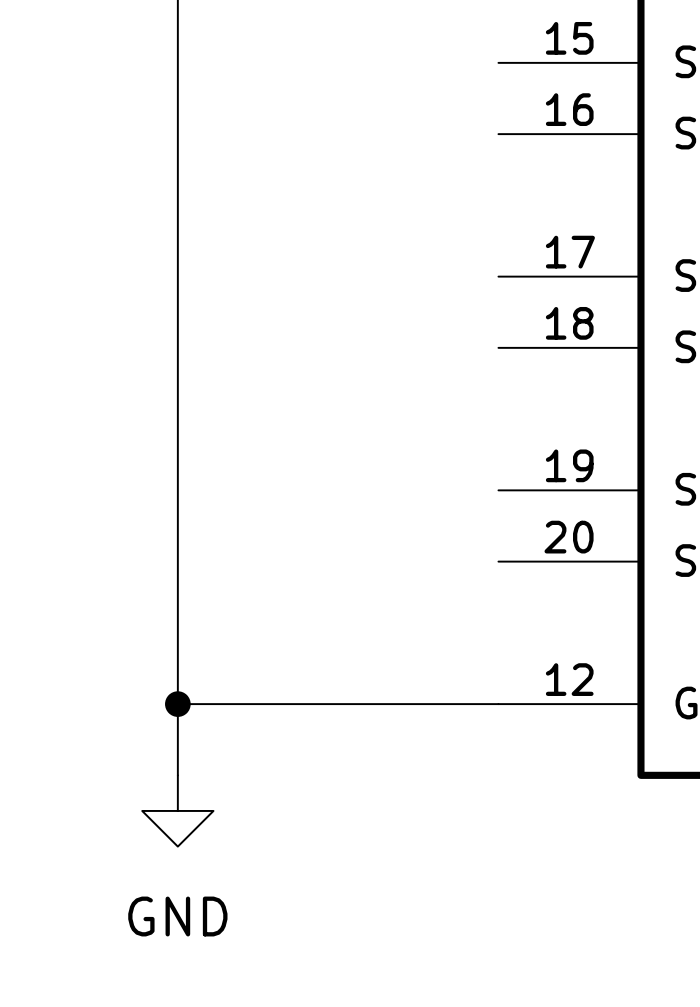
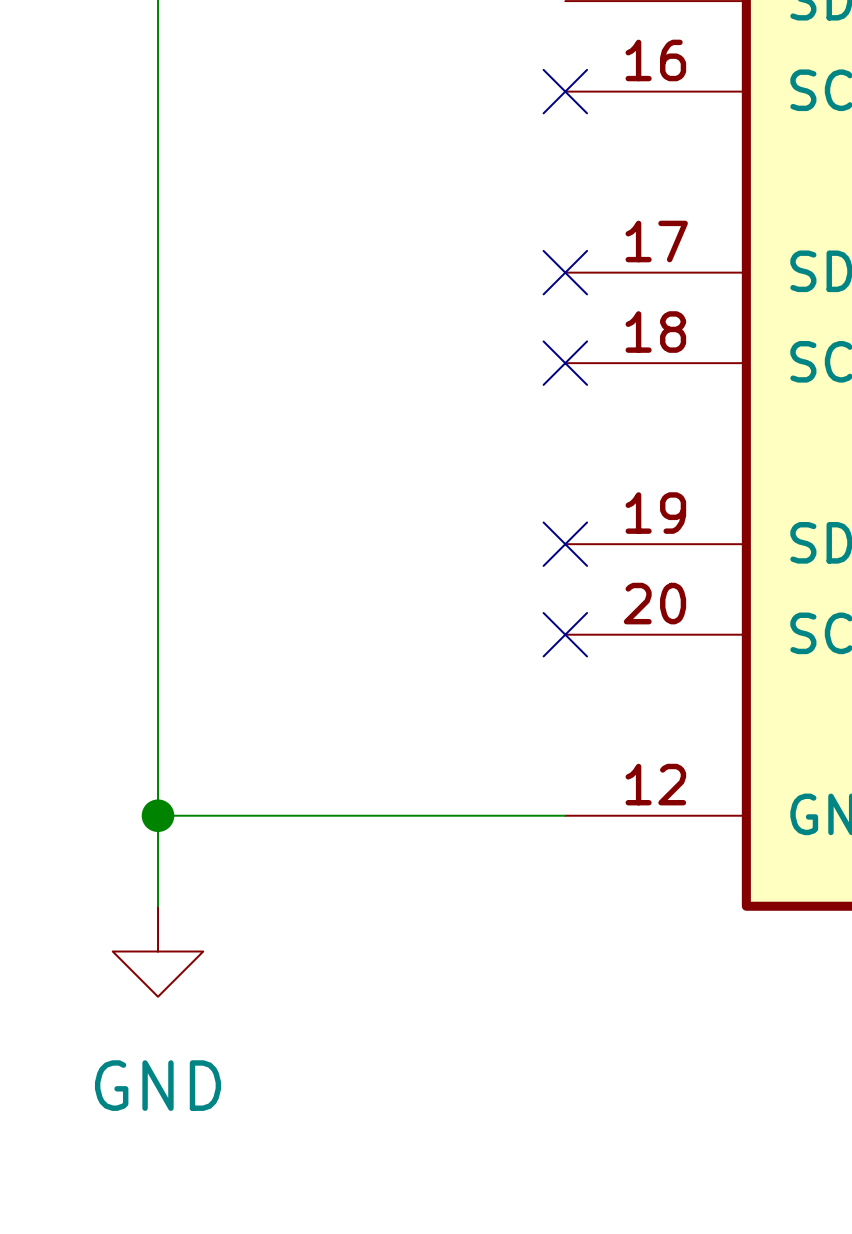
no-connect mark: none -> (565, 91)
no-connect mark: none -> (565, 272)
no-connect mark: none -> (565, 363)
no-connect mark: none -> (565, 544)
no-connect mark: none -> (565, 634)

